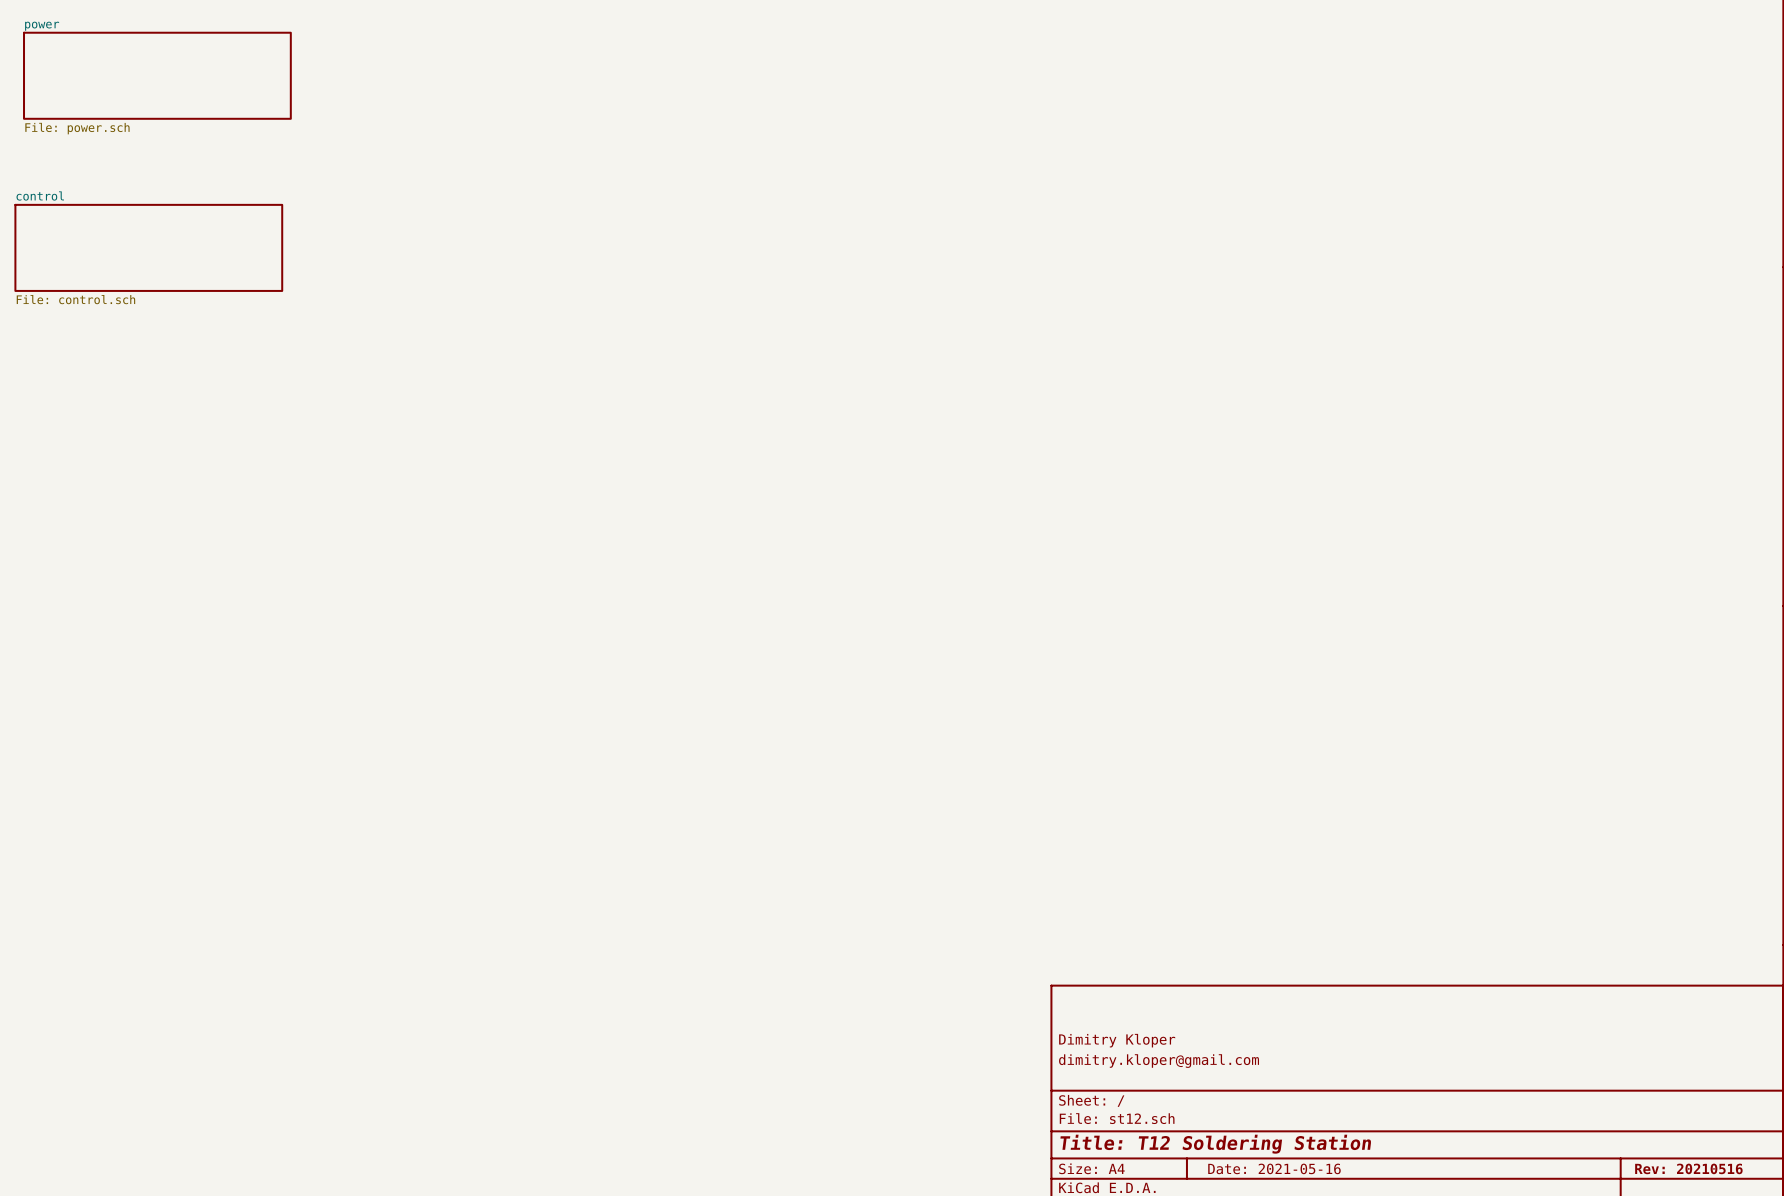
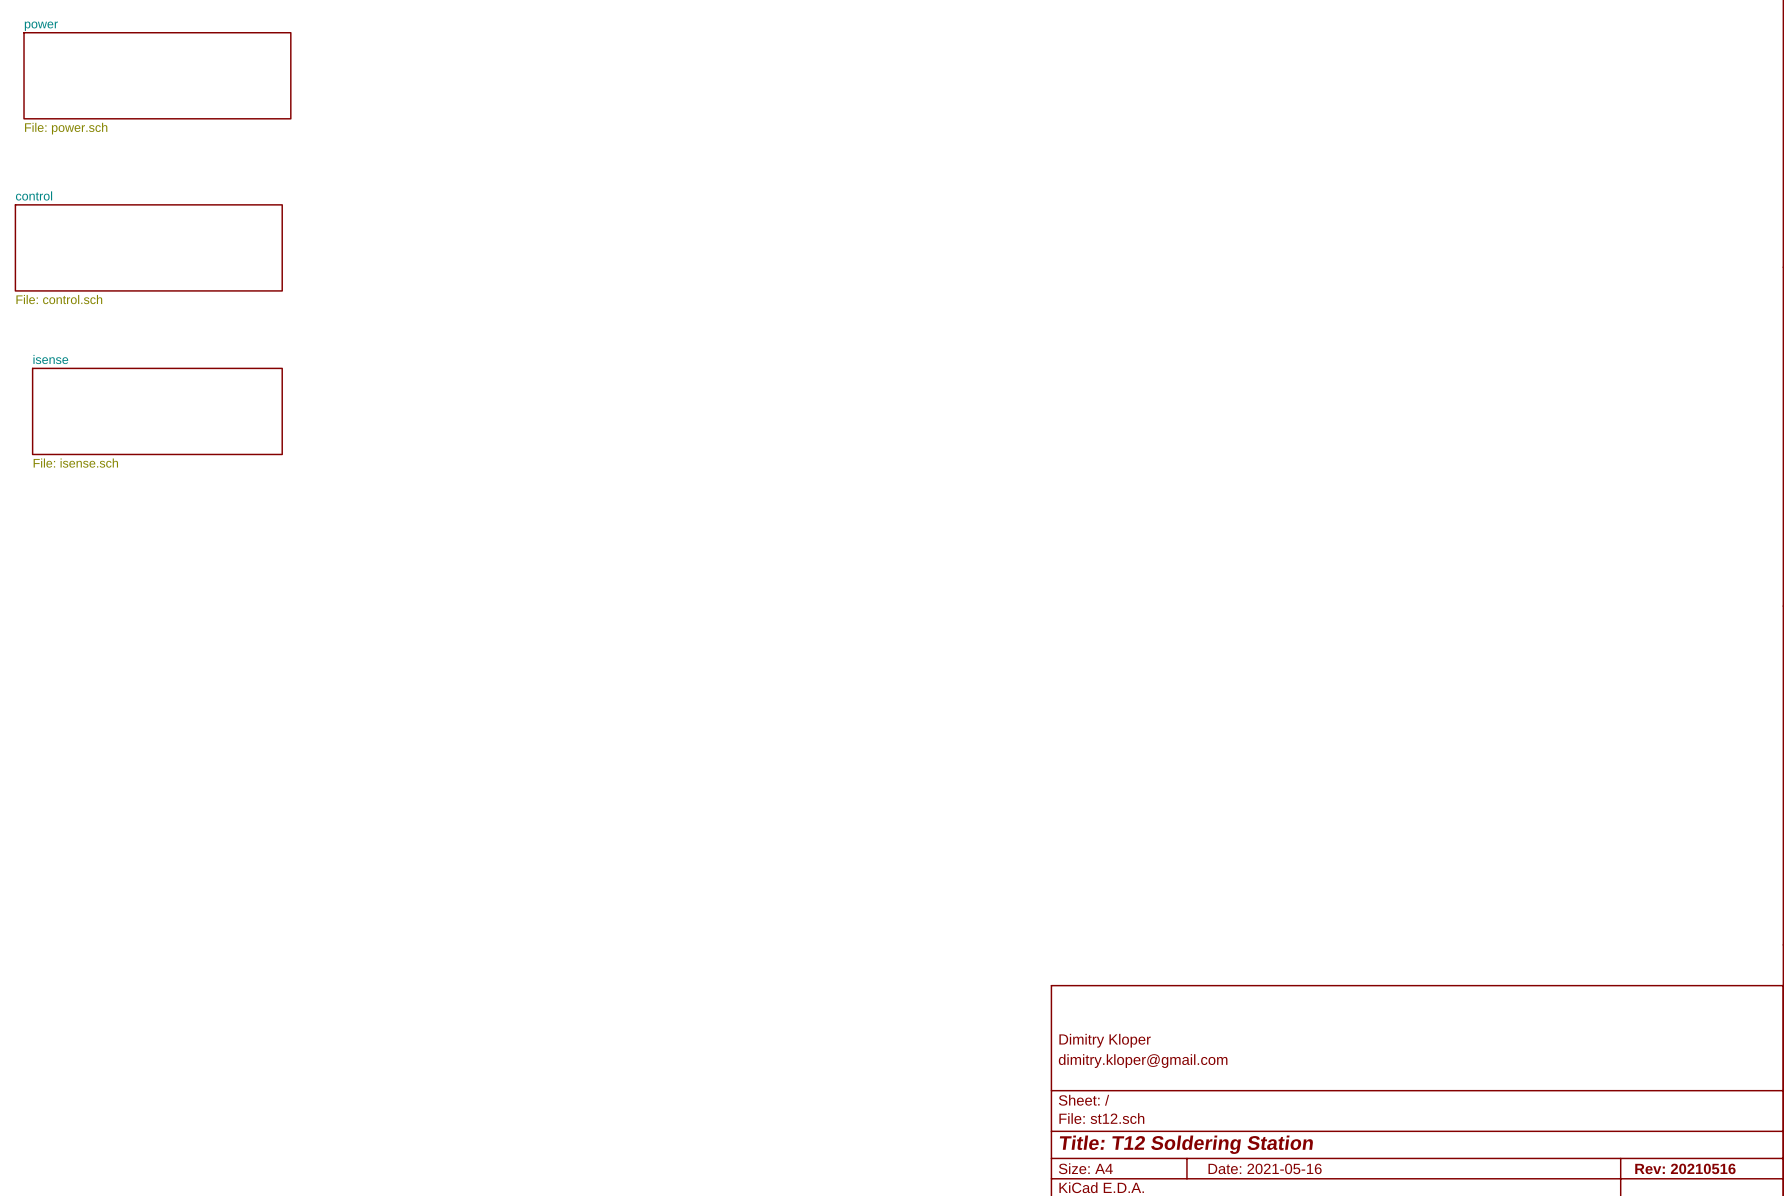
sheet isense: none -> File: isense.sch (157, 411)

